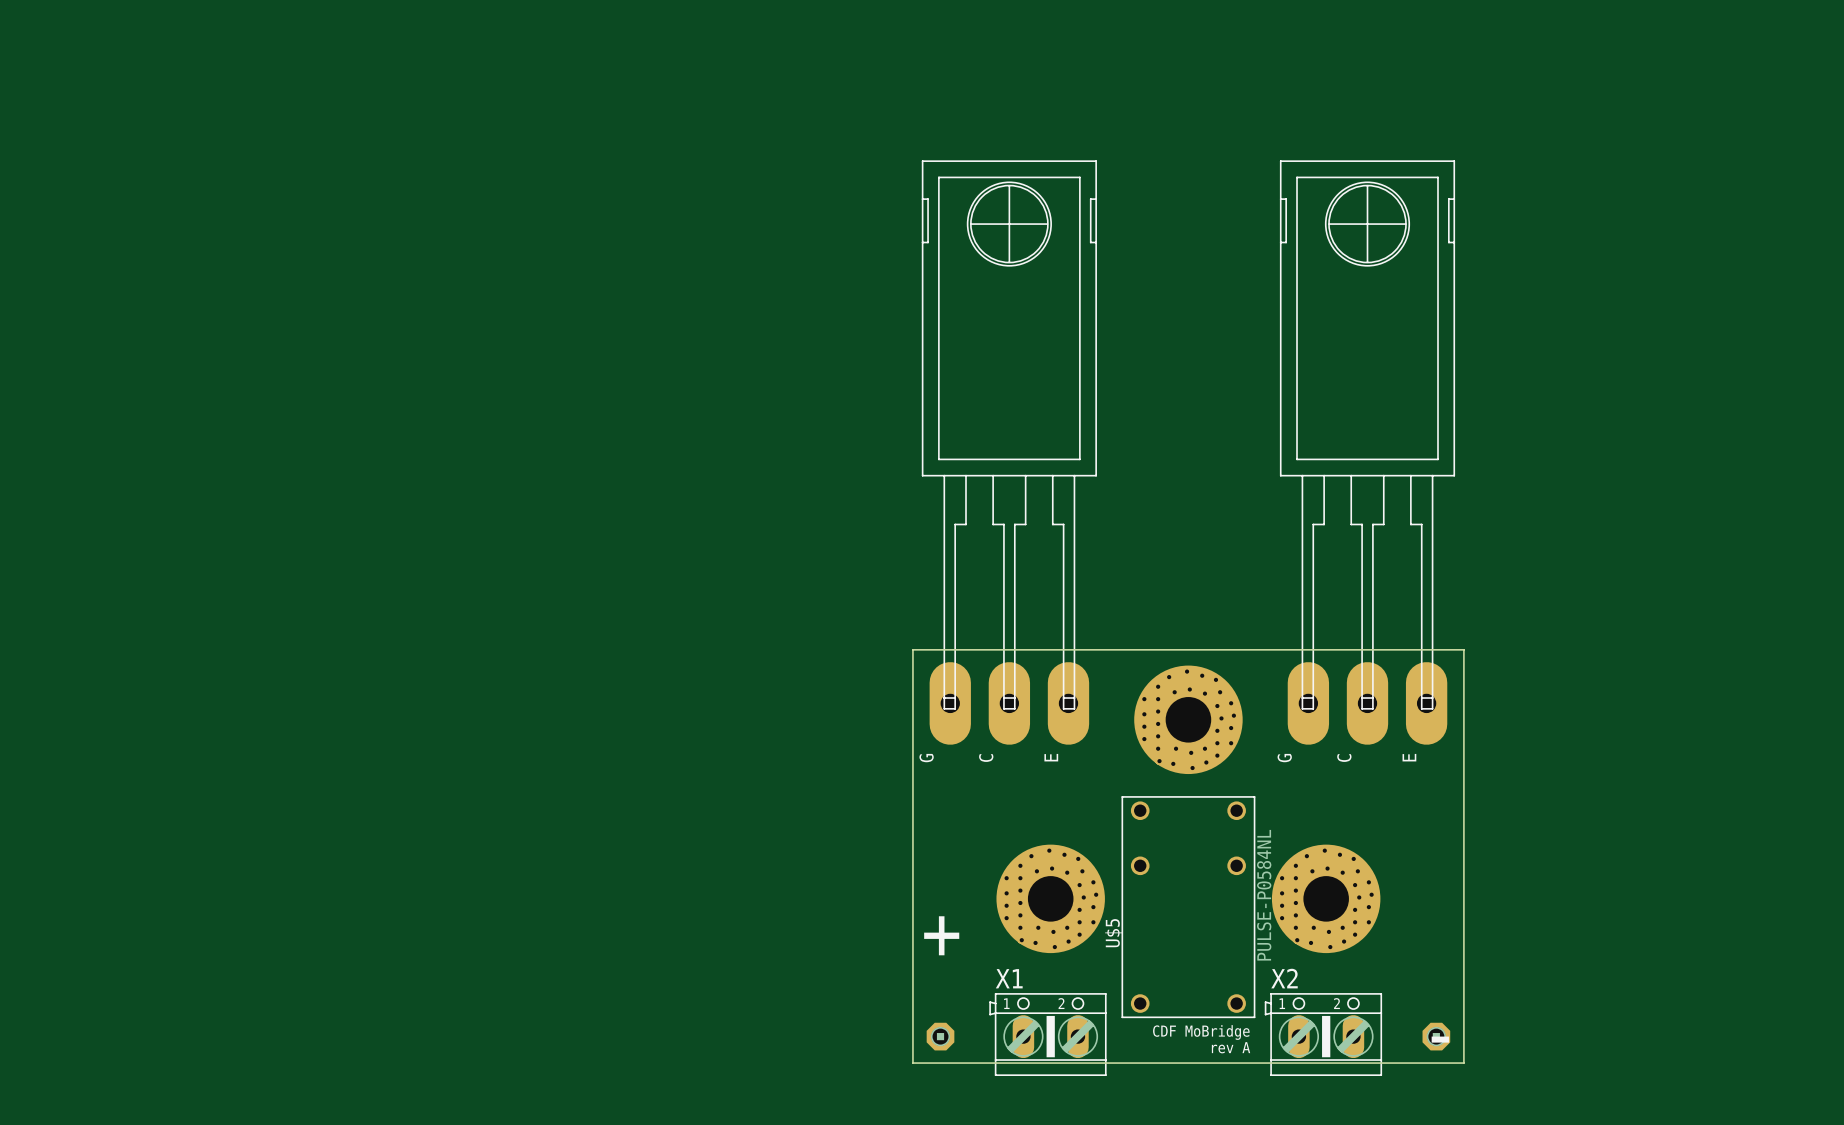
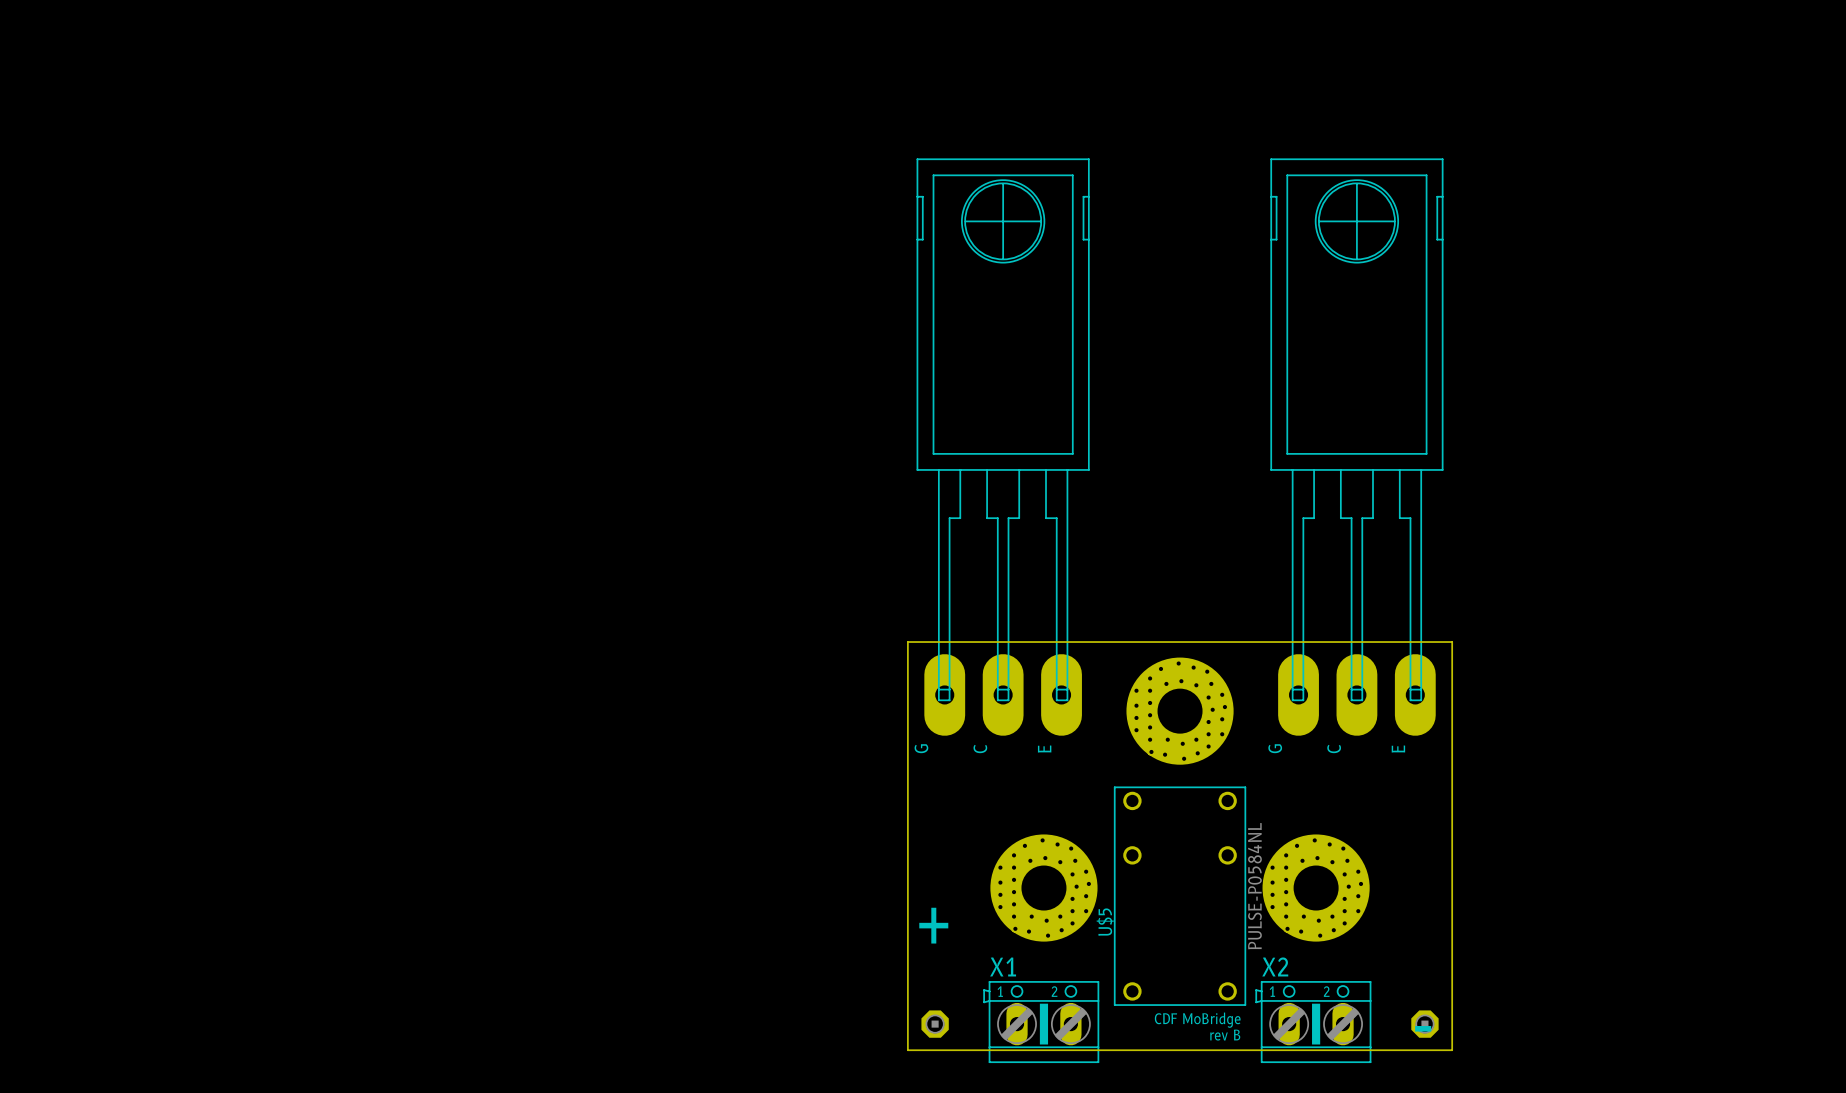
text: rev A (1231, 1047) -> rev B (1225, 1035)

